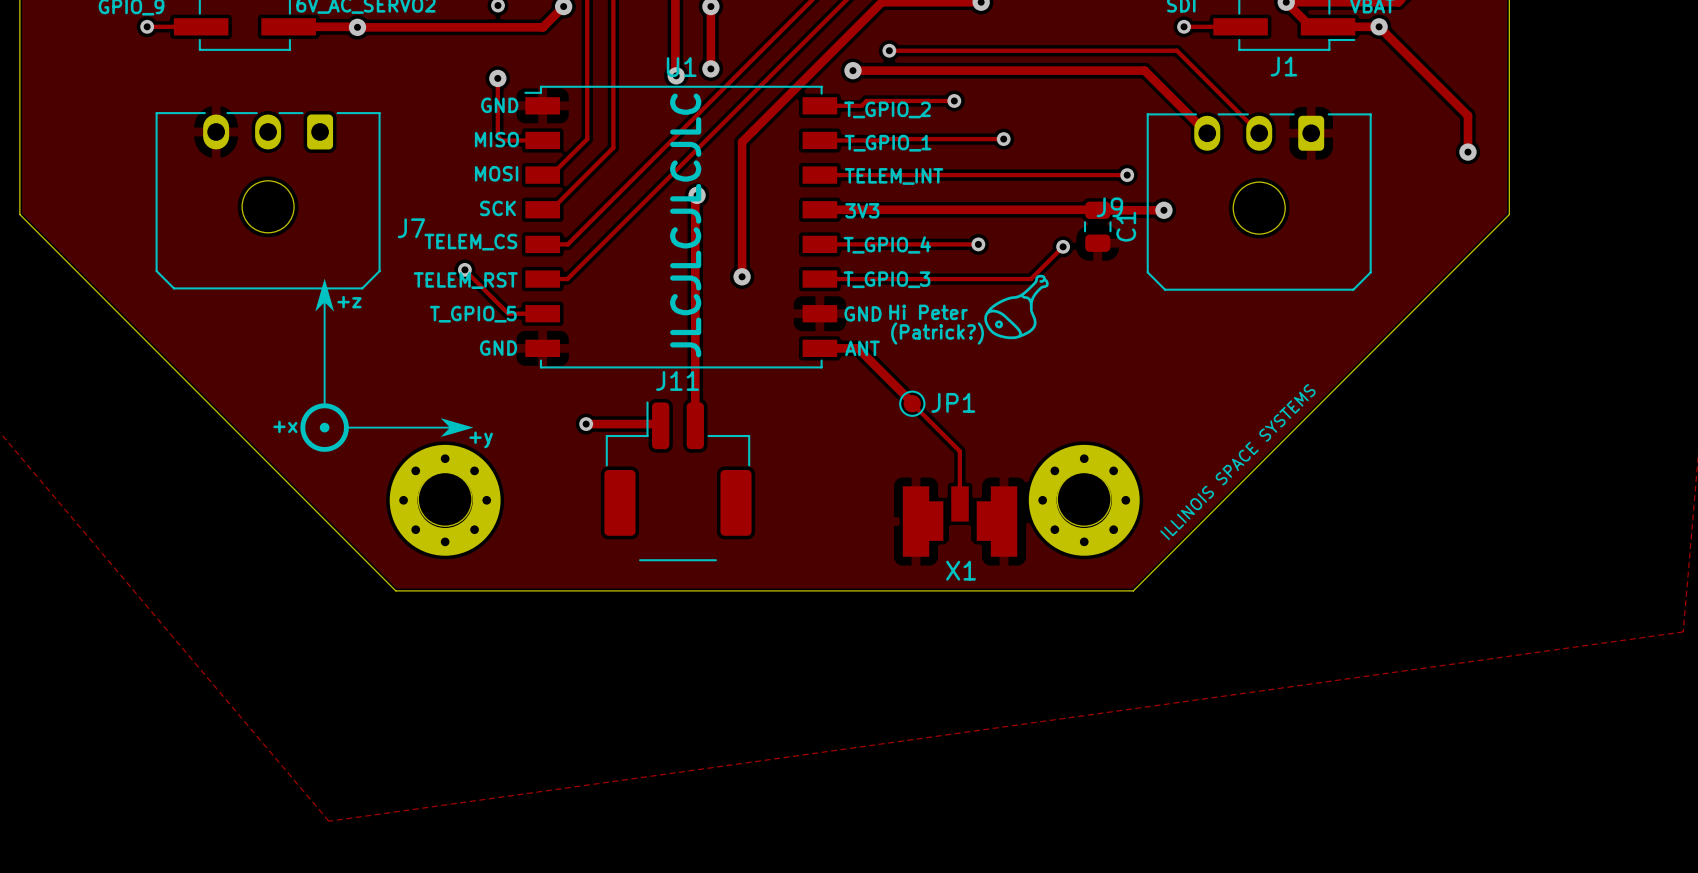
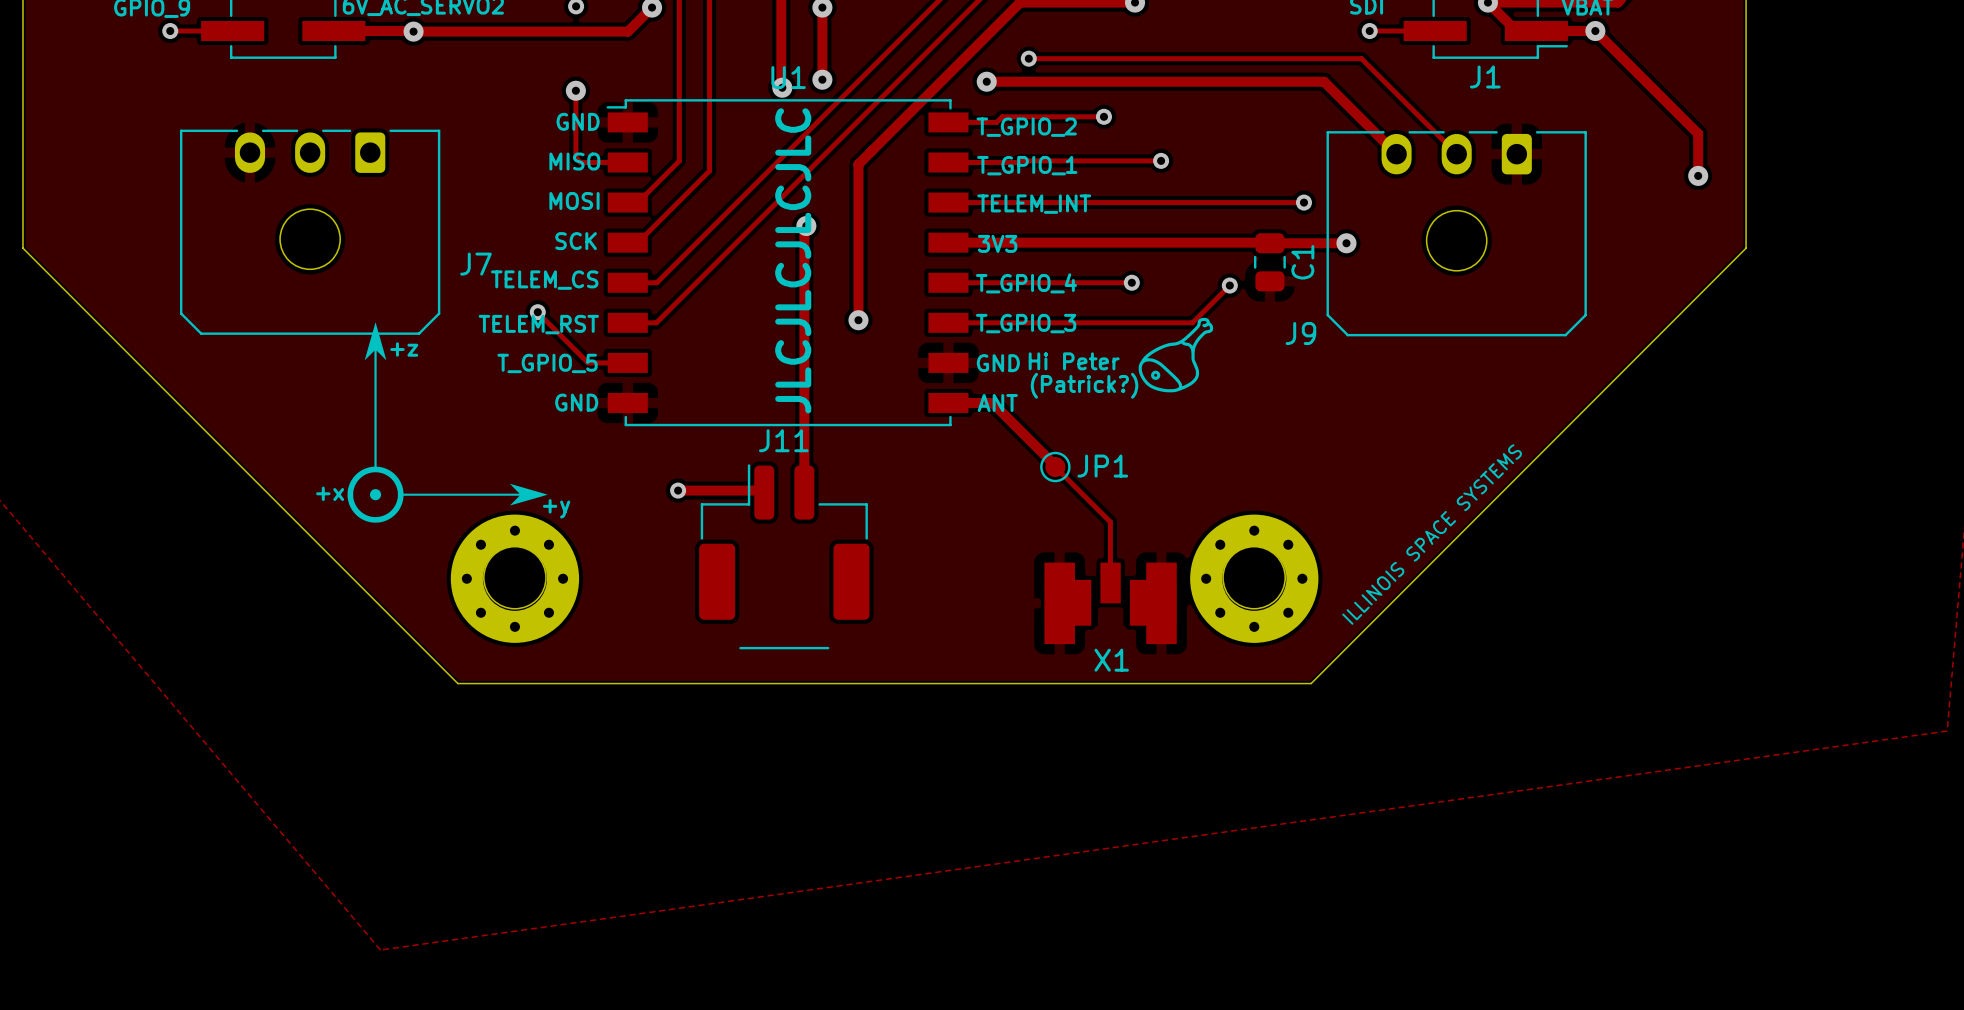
J9 name position: J9 (1109, 207) -> J9 (1300, 333)

